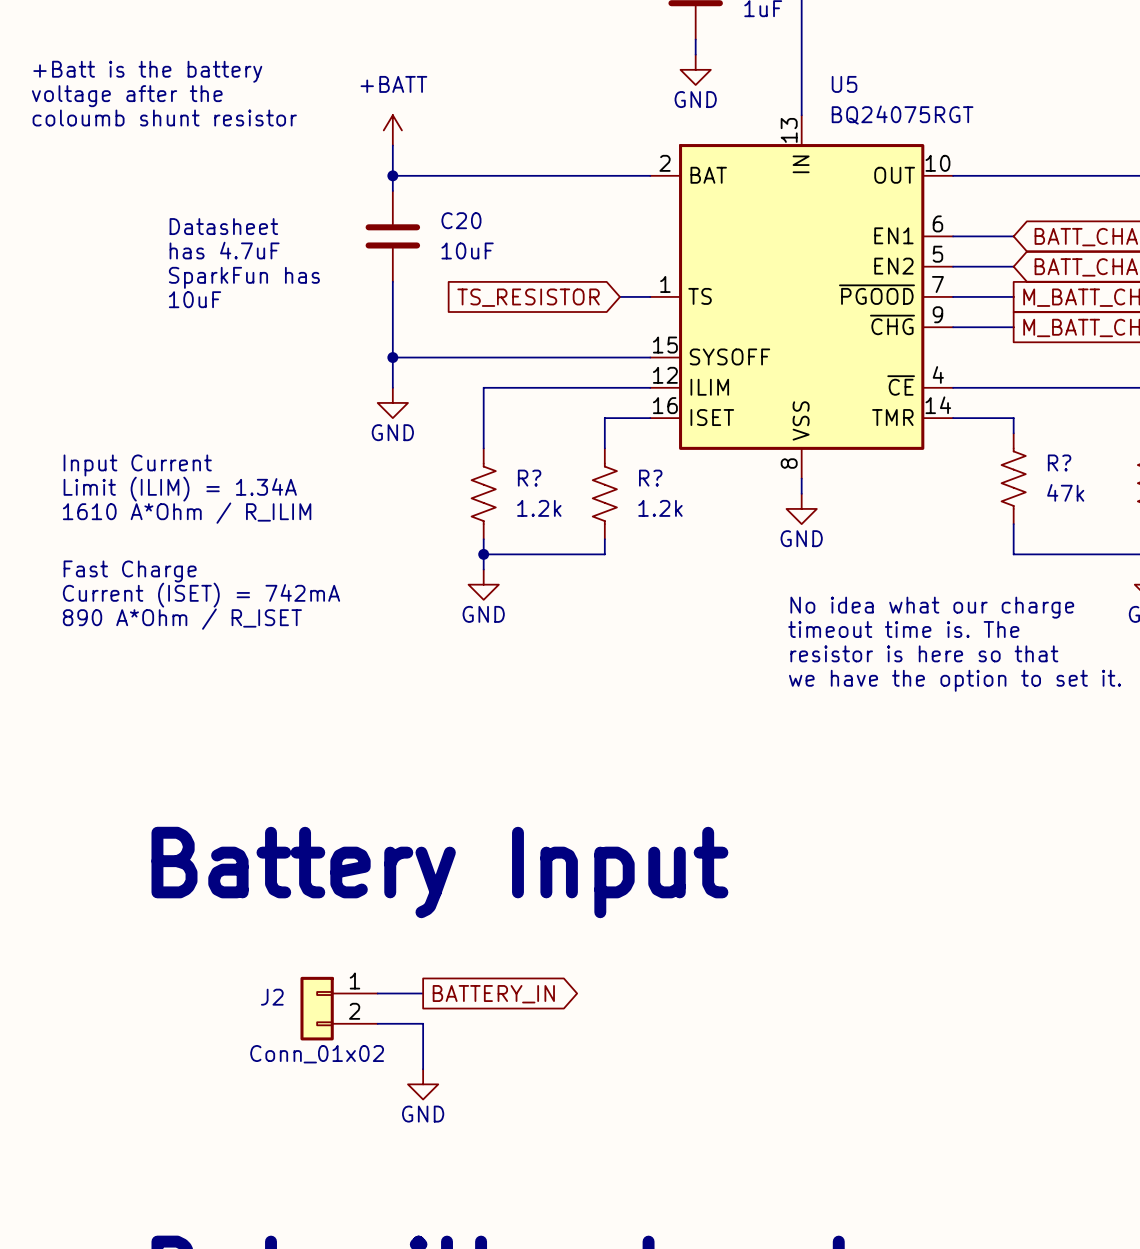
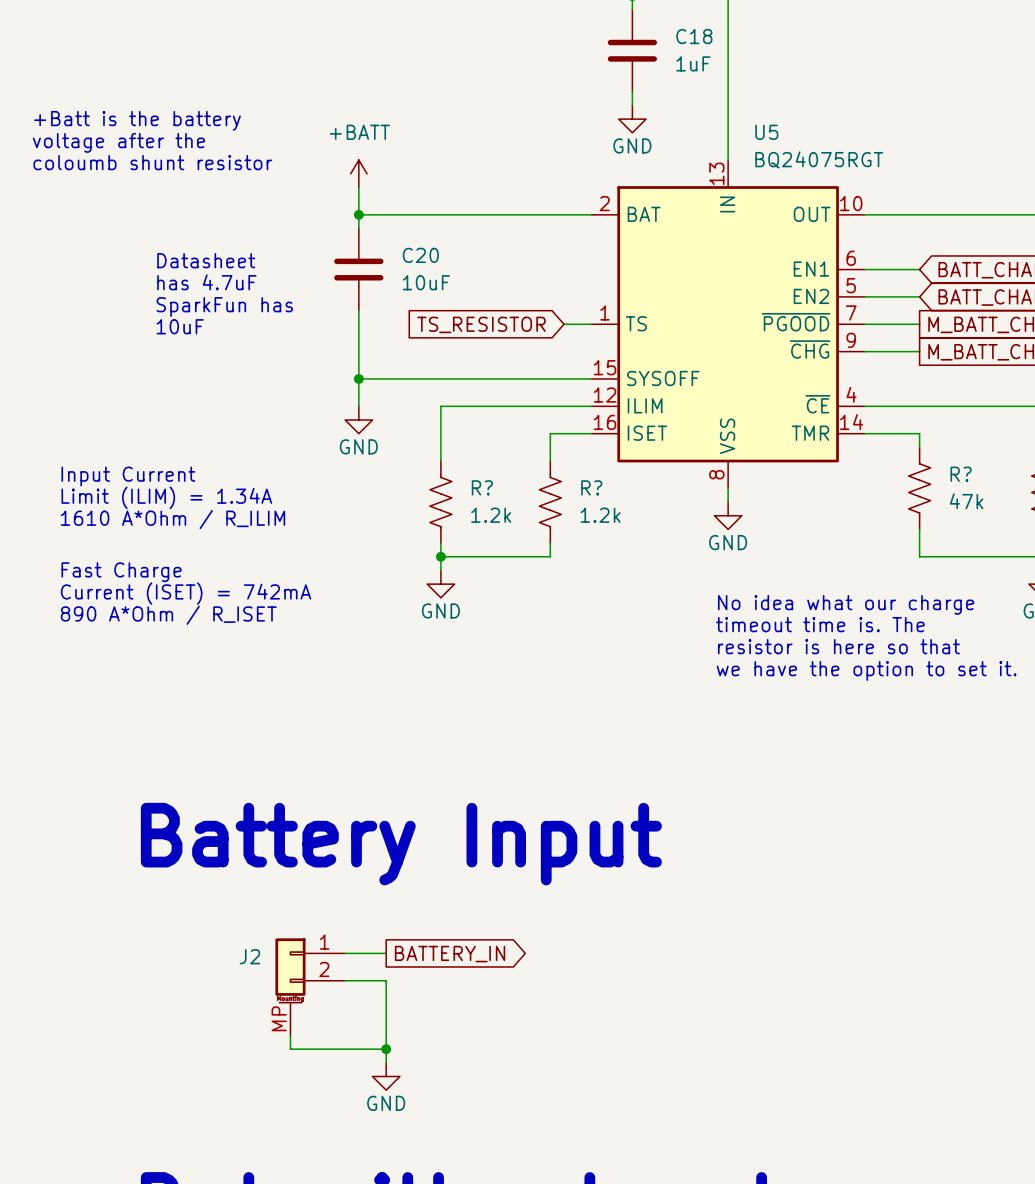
J2 symbol: [300, 976, 378, 1041] -> [275, 938, 346, 1036]
J2 value: Conn_01x02 (317, 1054) -> none
wire: none -> (386, 1021) (386, 1062)
wire: none -> (290, 1035) (290, 1049) (386, 1049)
power symbol position: GND (423, 1084) -> GND (386, 1076)
junction: none -> (386, 1049)

